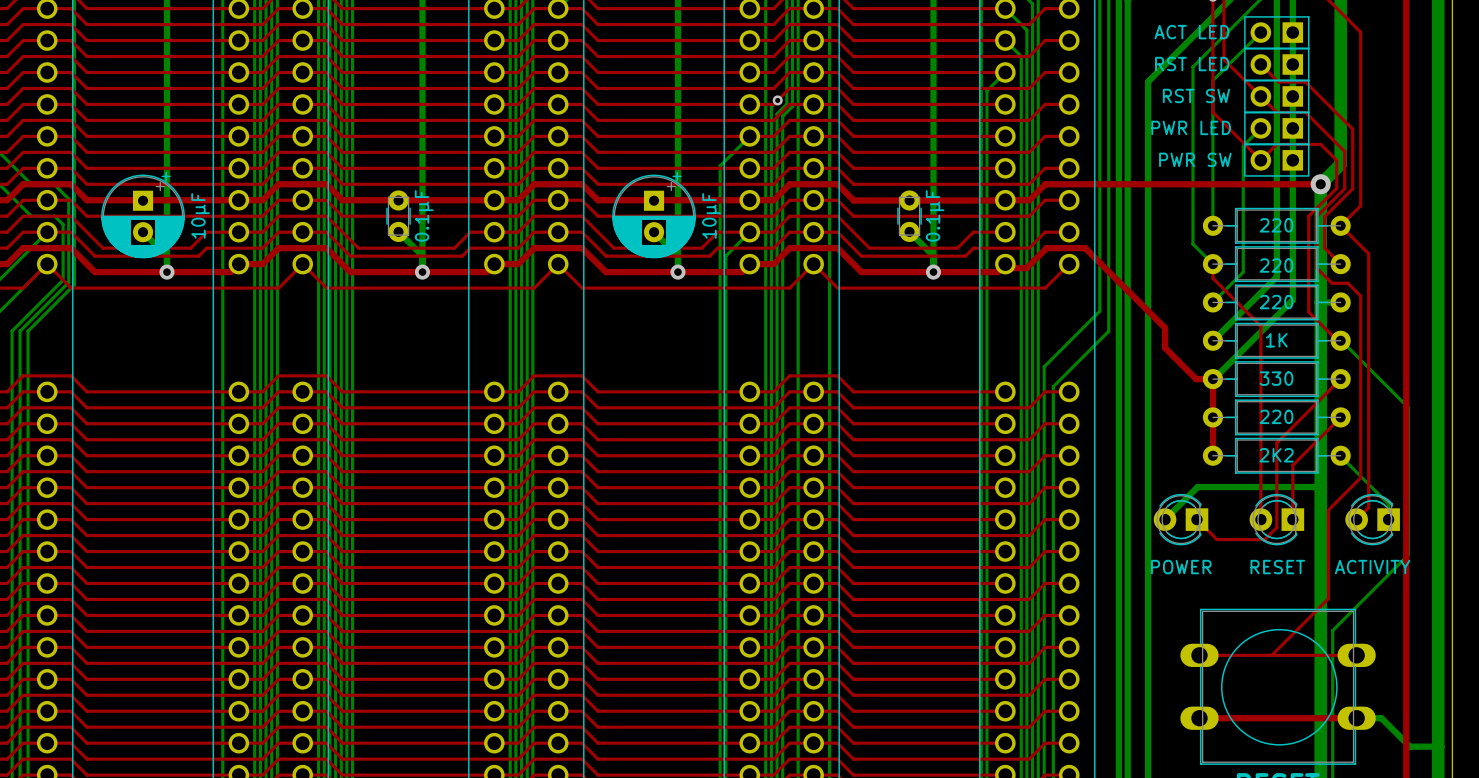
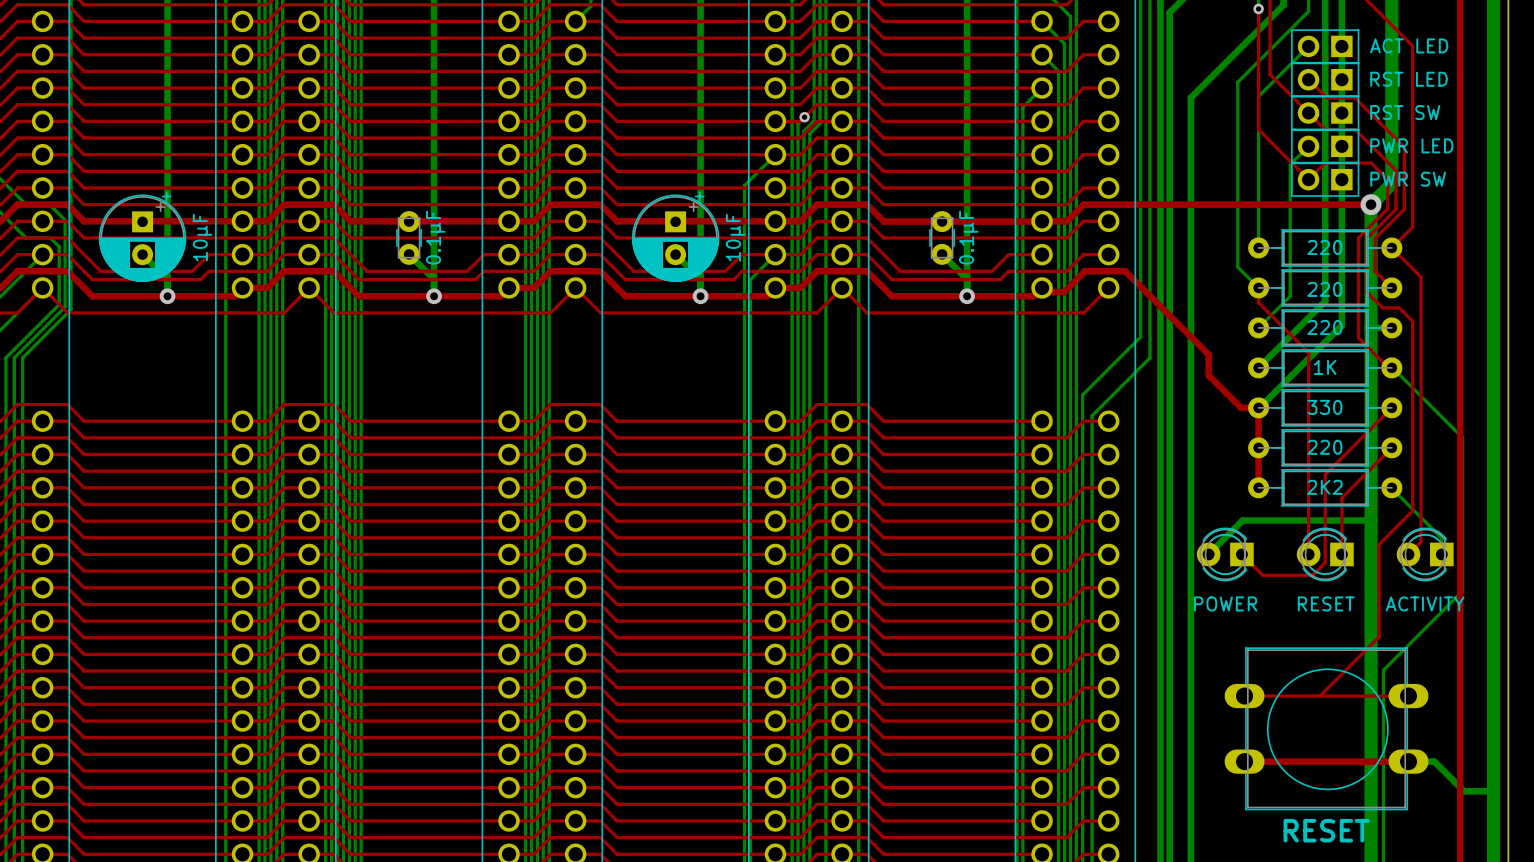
part value position: ACT LED (1191, 32) -> ACT LED (1409, 45)
part value position: RST LED (1192, 64) -> RST LED (1409, 79)
part value position: RST SW (1196, 95) -> RST SW (1405, 112)
part value position: PWR LED (1191, 127) -> PWR LED (1411, 145)
part value position: PWR SW (1195, 159) -> PWR SW (1408, 179)

